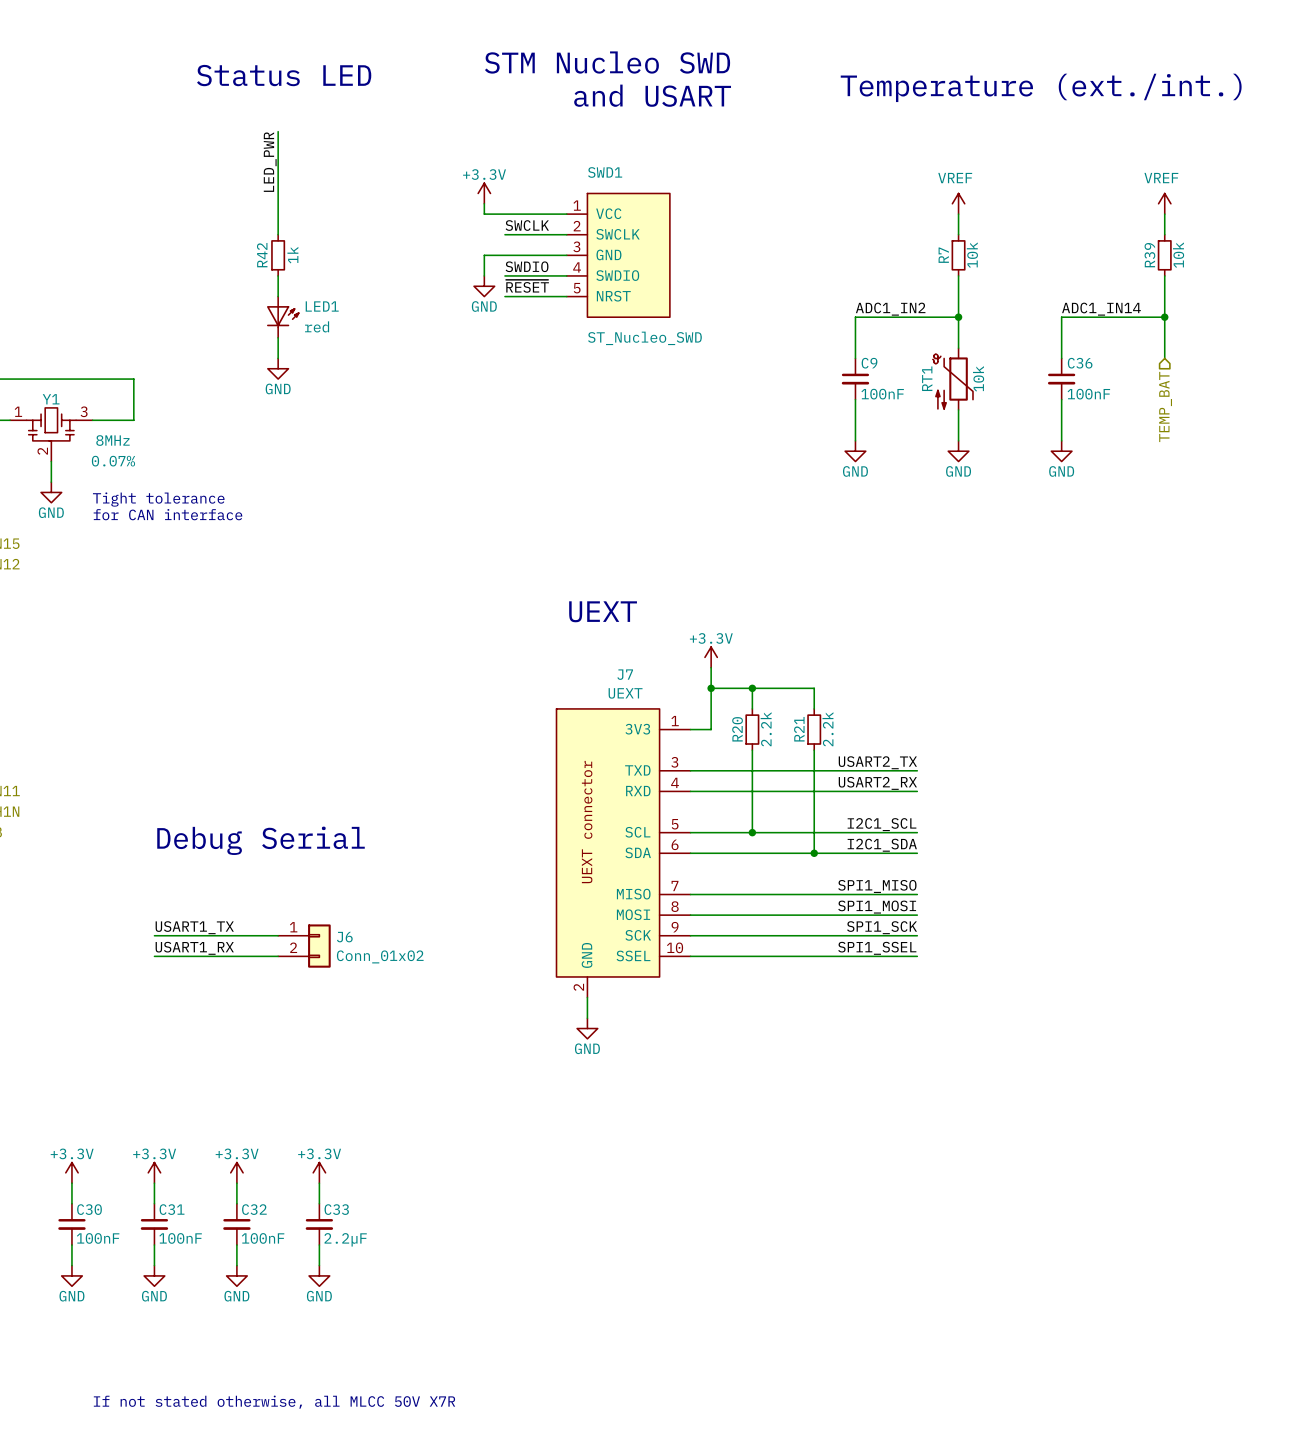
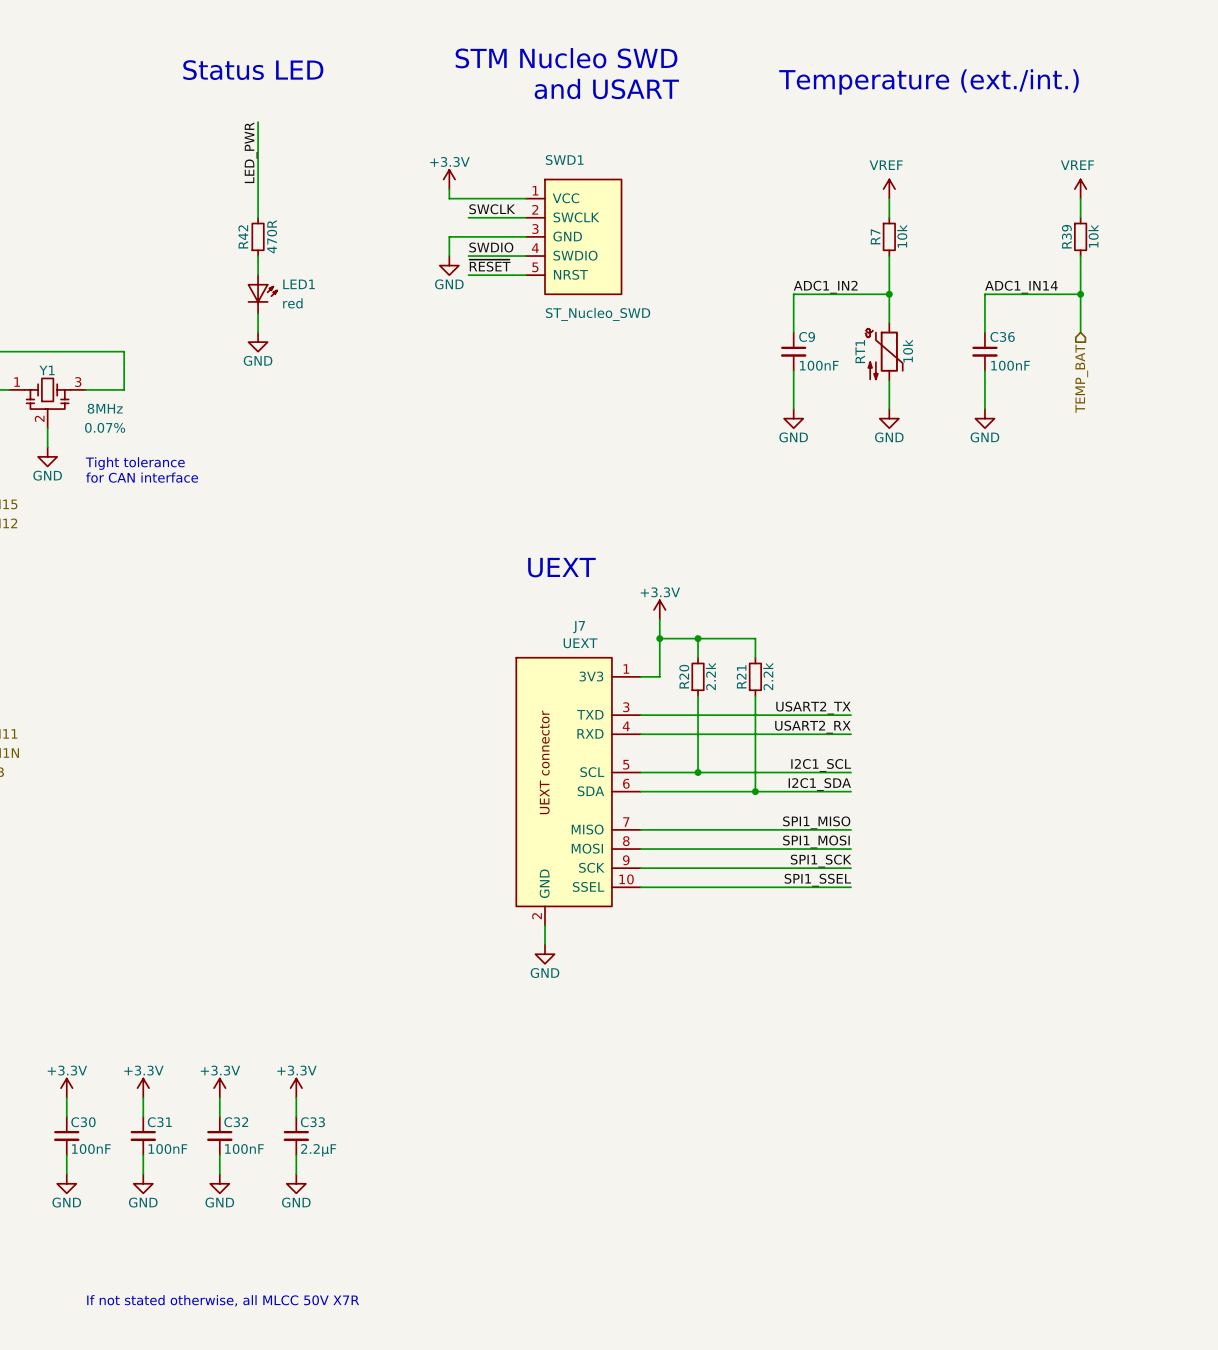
R42 value: 1k (292, 255) -> 470R (272, 236)
text: Debug Serial (261, 840) -> none
label: USART1_TX (194, 927) -> none
wire: (154, 935) (278, 935) -> none
J6: Conn_01x02 (304, 946) -> none
label: USART1_RX (194, 948) -> none
wire: (154, 956) (278, 956) -> none

